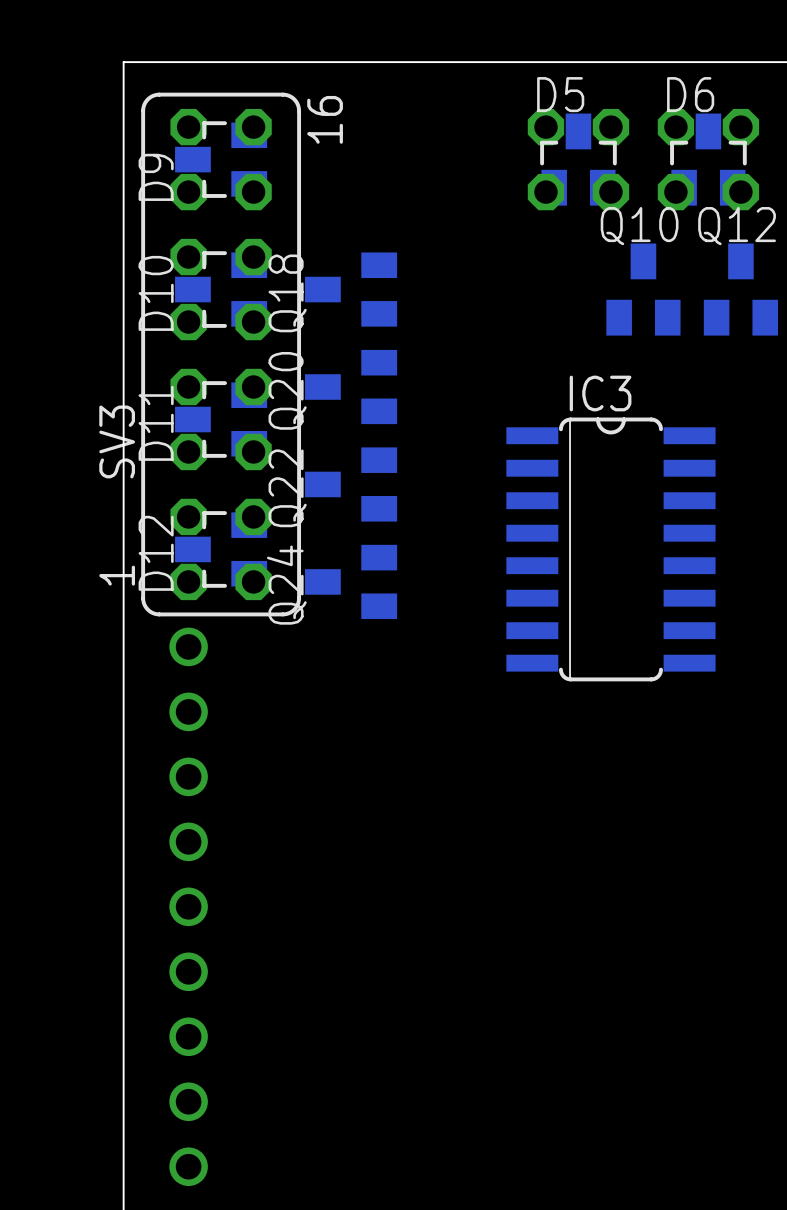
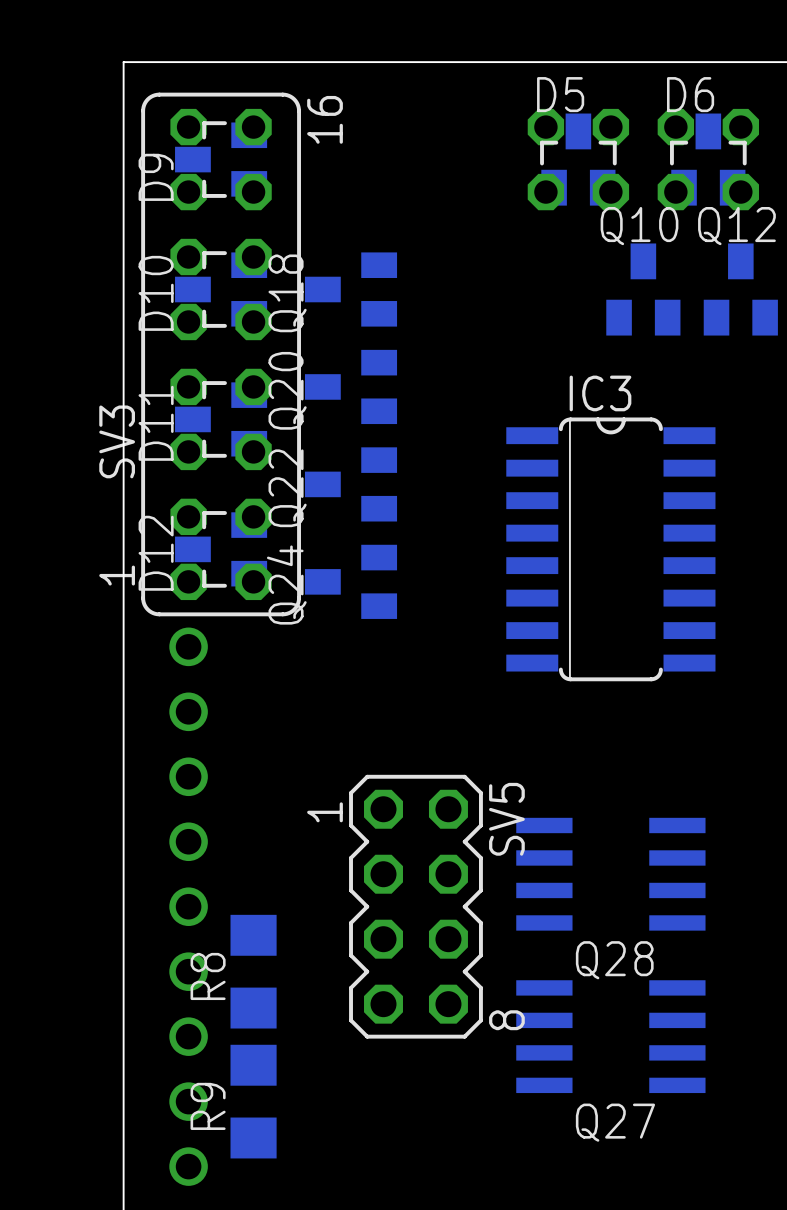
Q28: none -> (610, 874)
SV5: none -> (415, 906)
R8: none -> (253, 971)
Q27: none -> (610, 1036)
R9: none -> (253, 1101)

